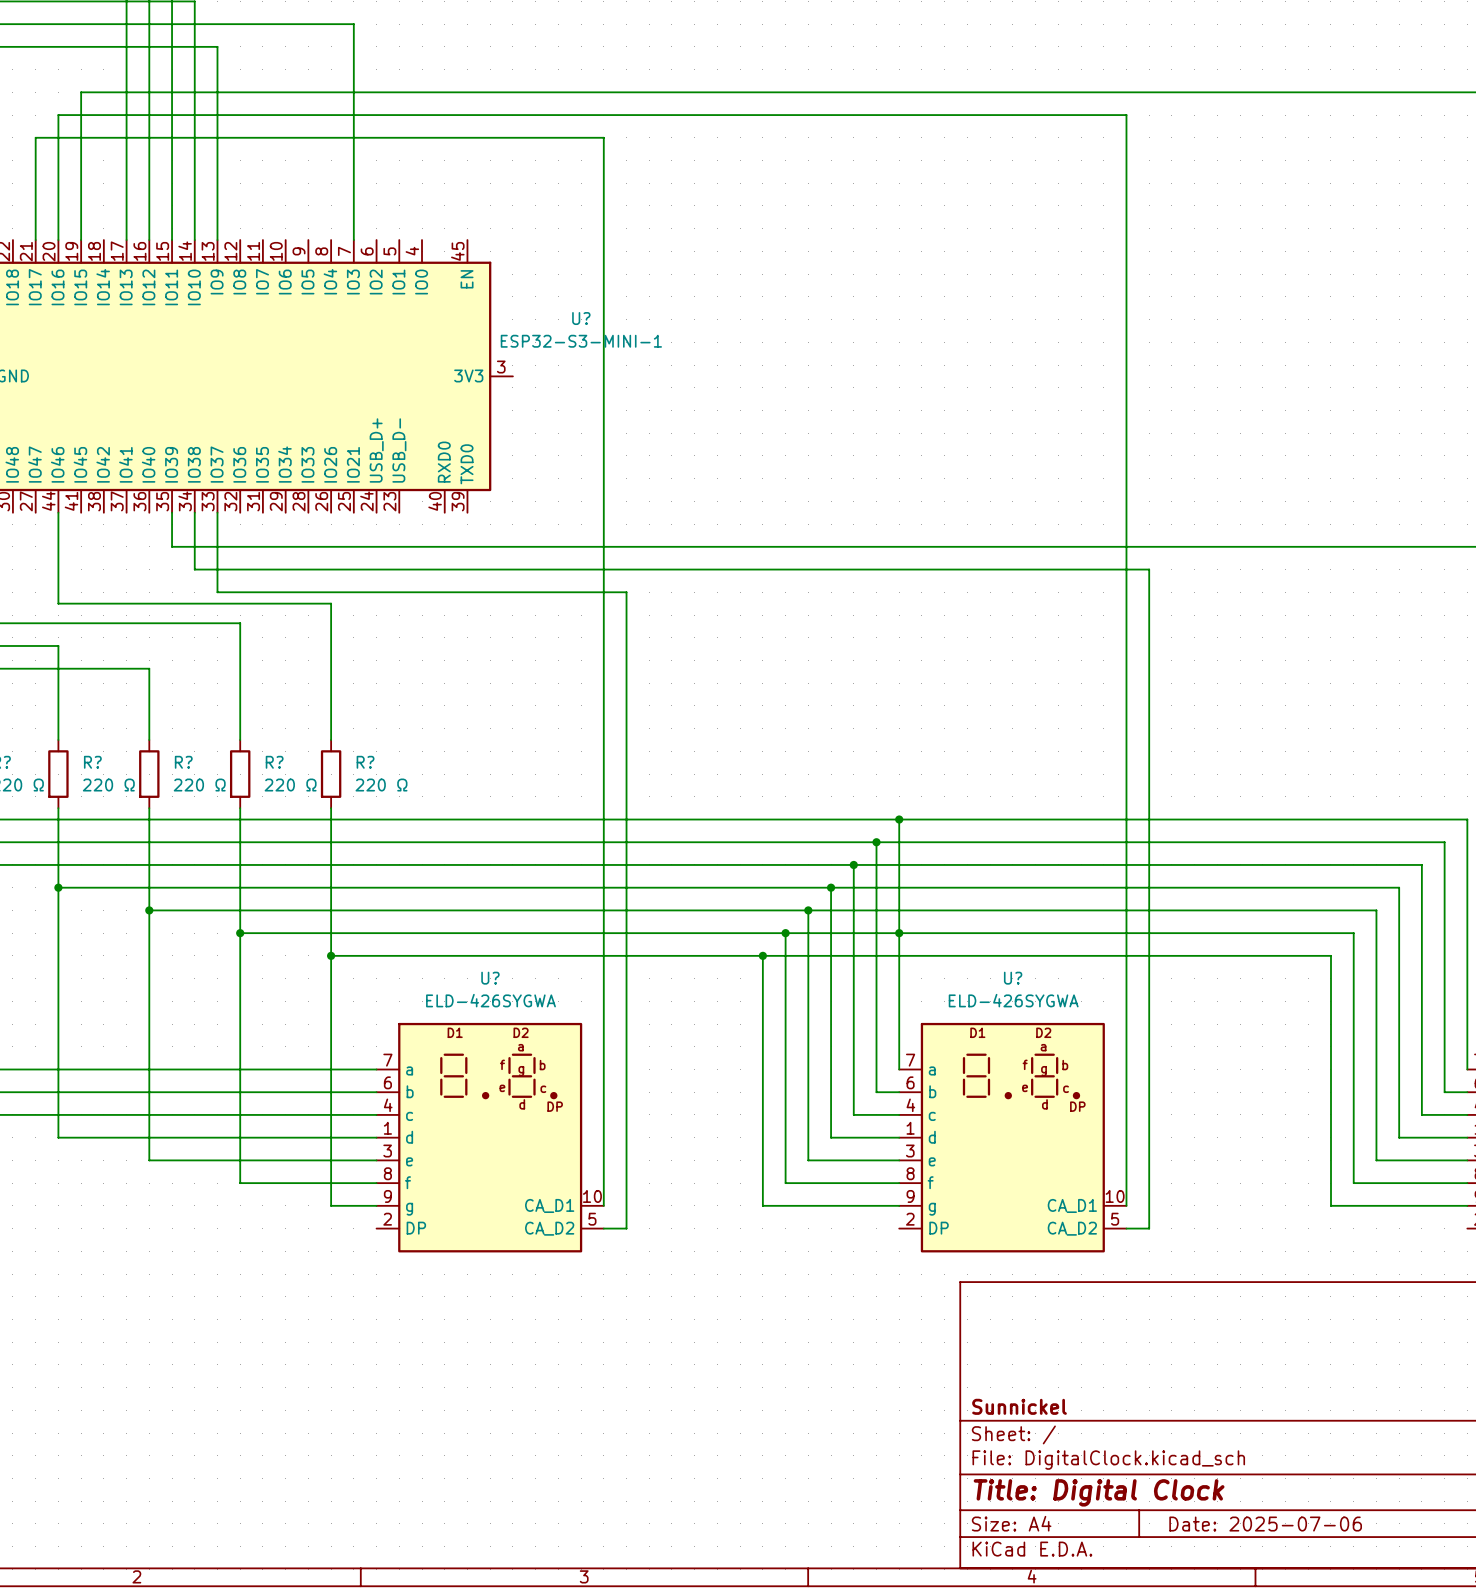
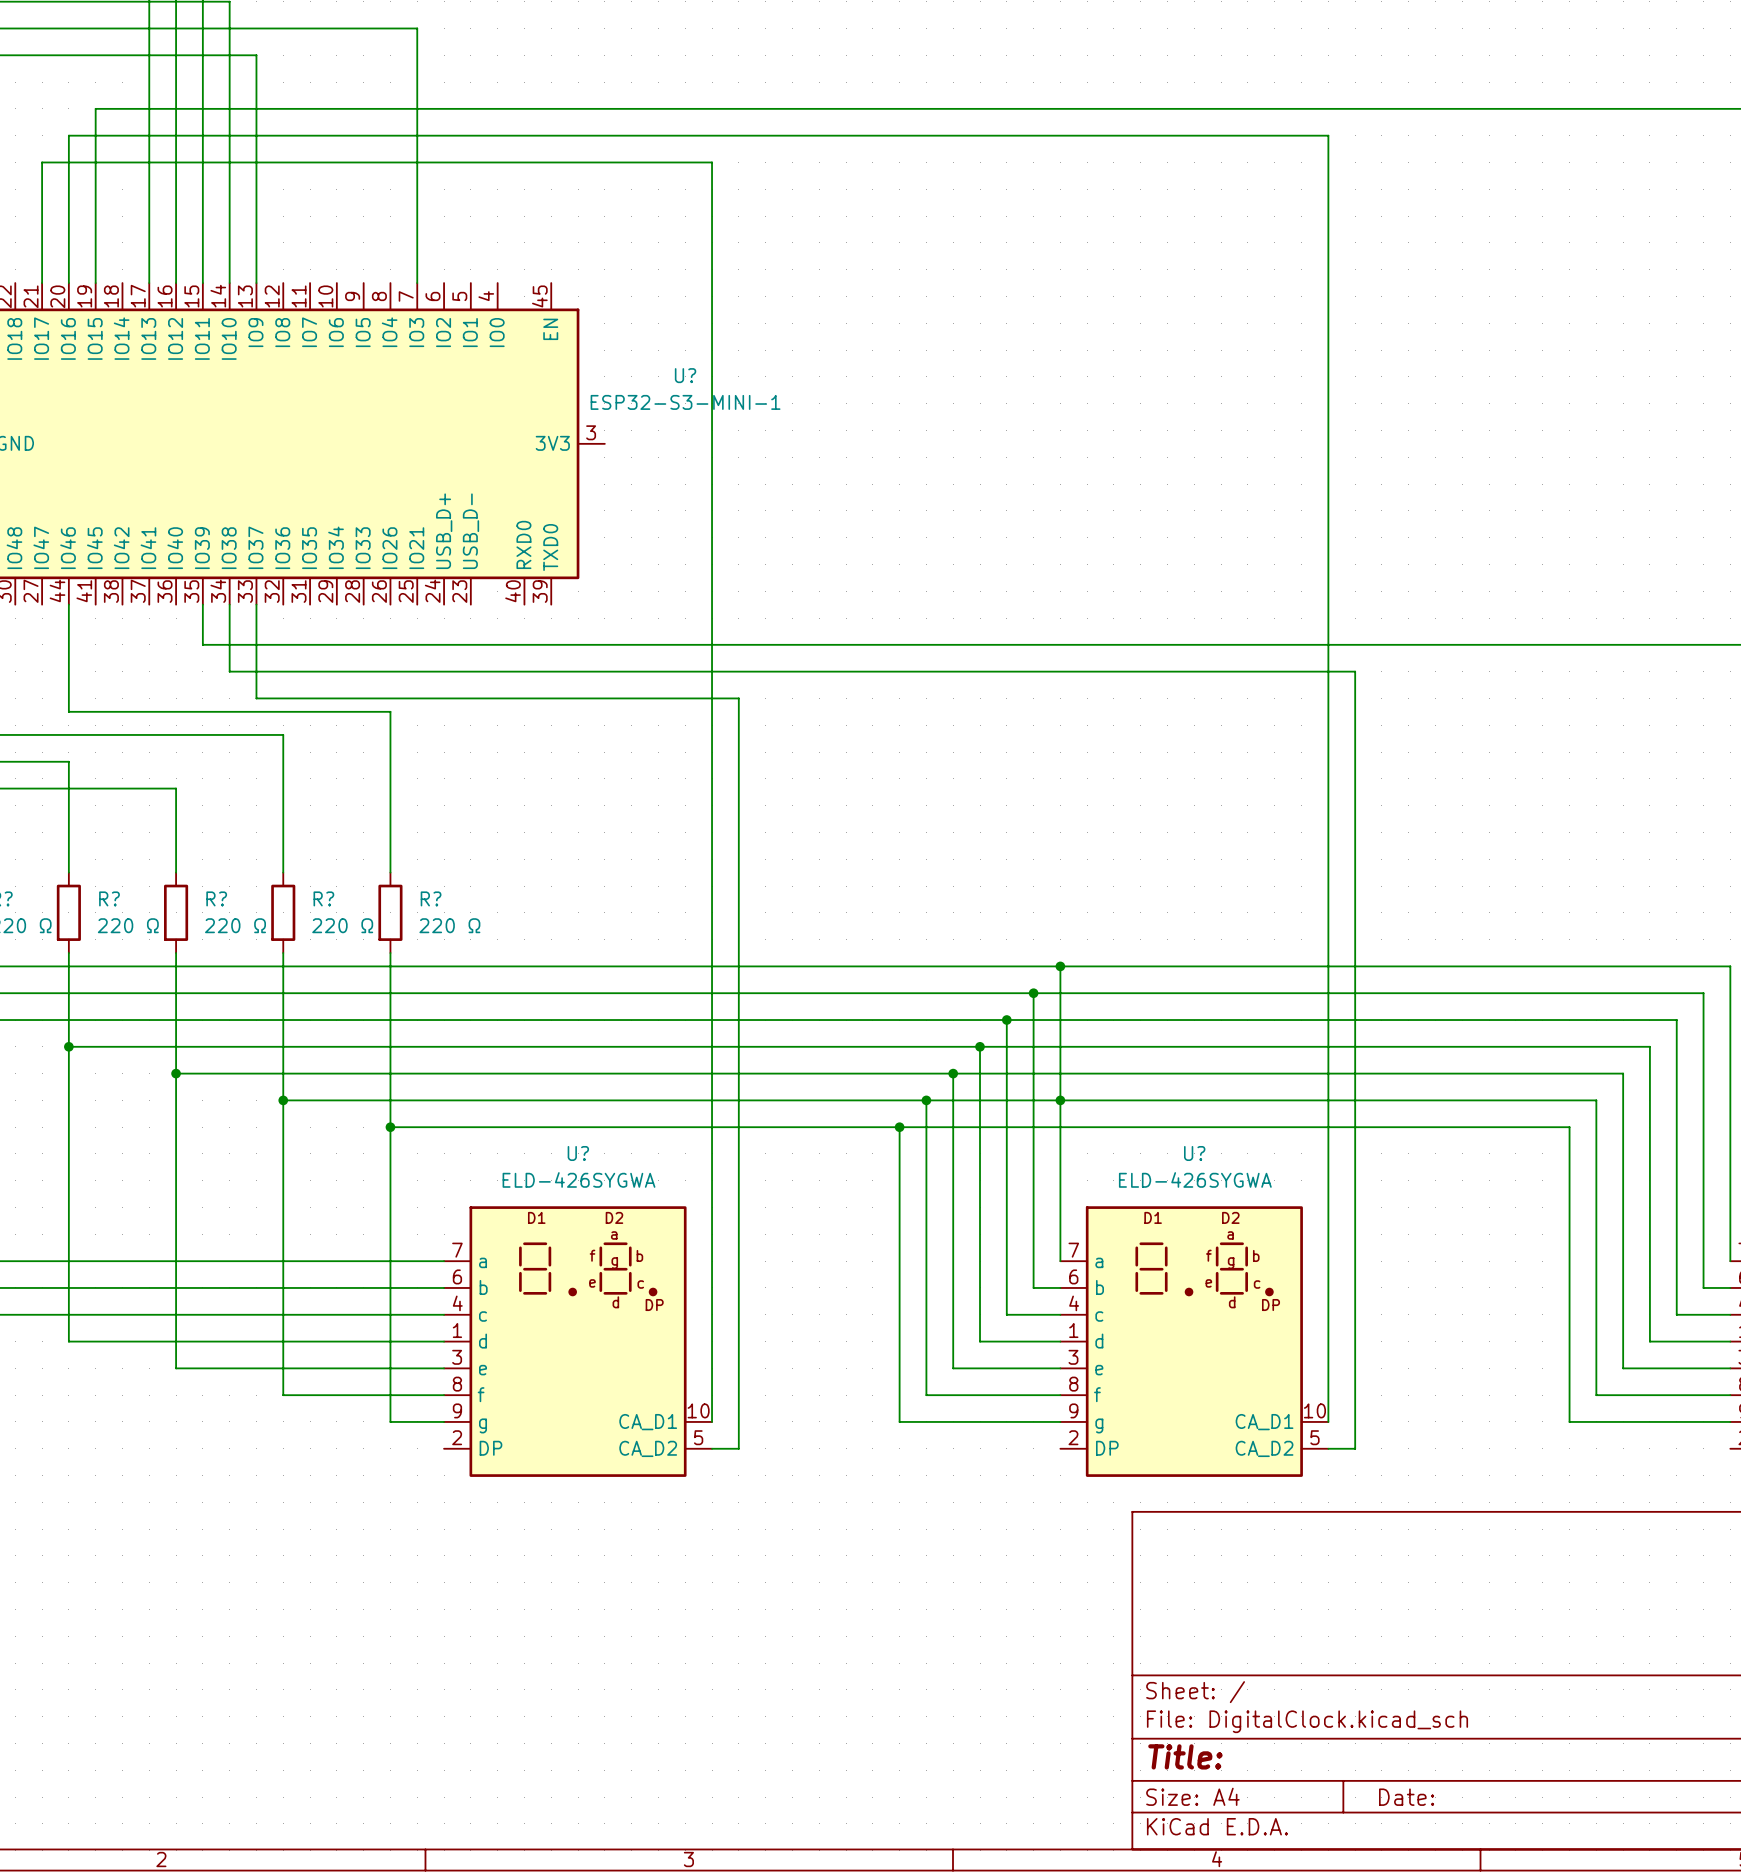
title block: Sunnickel (1019, 1406) -> none
title block: Title: Digital Clock (1099, 1492) -> Title: (1185, 1756)
title block: Date: 2025-07-06 (1265, 1524) -> Date: (1406, 1797)

